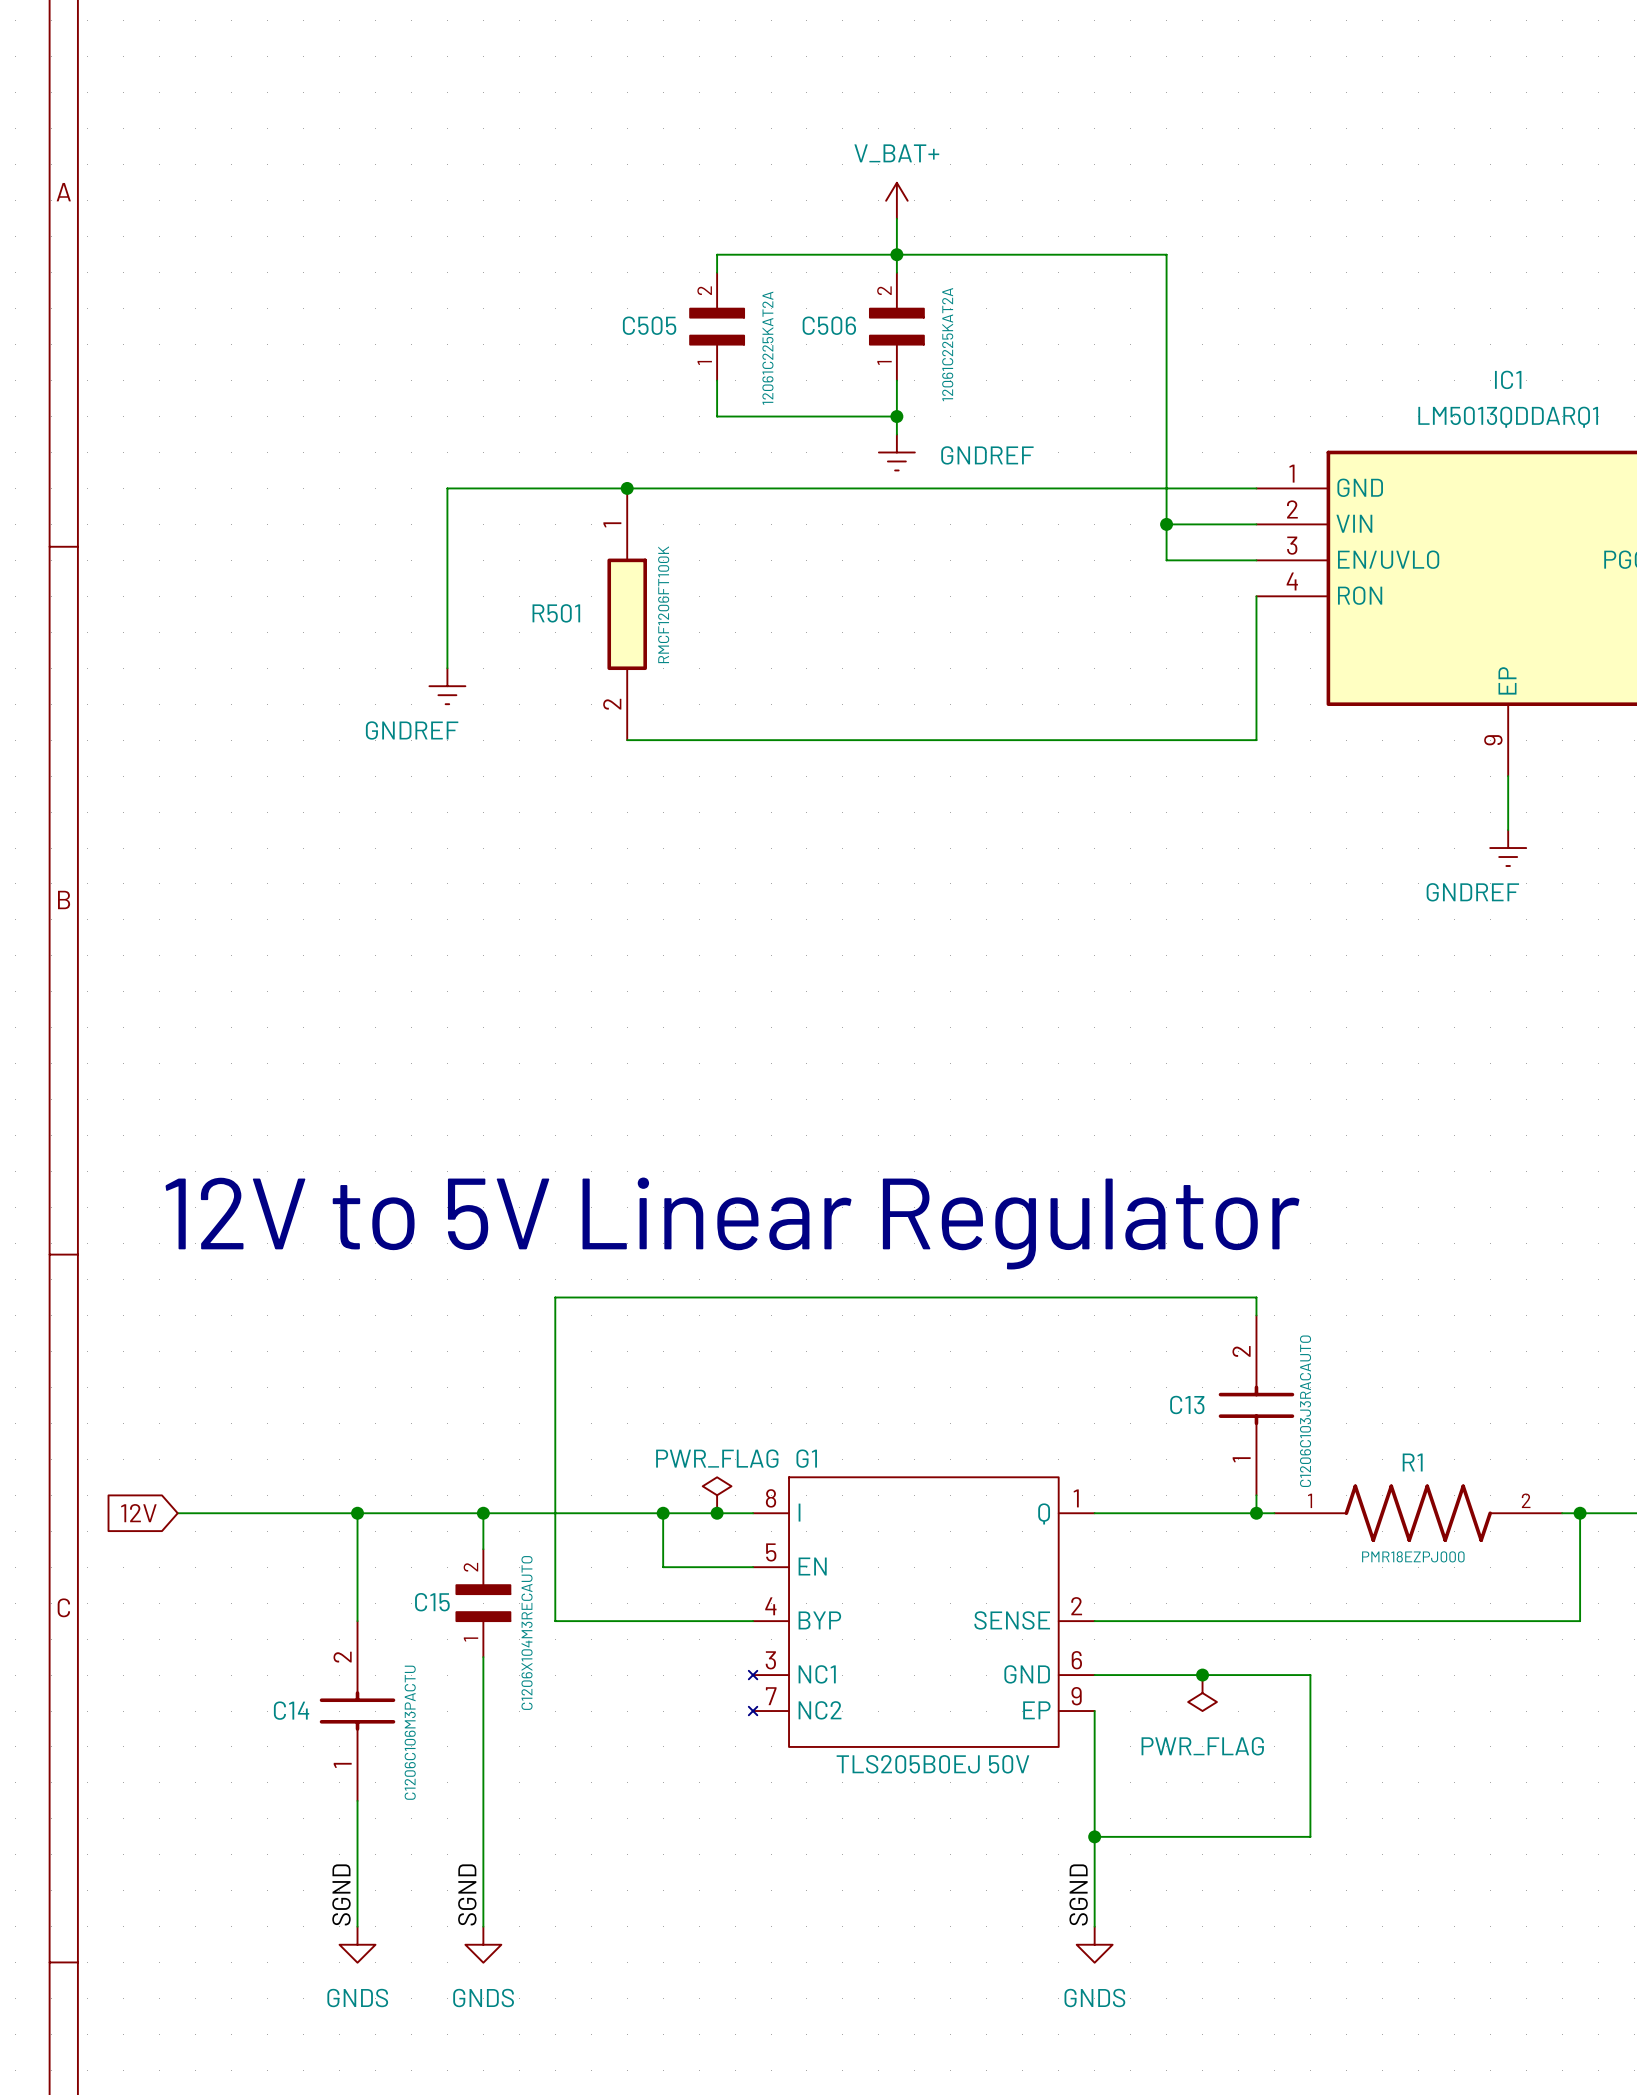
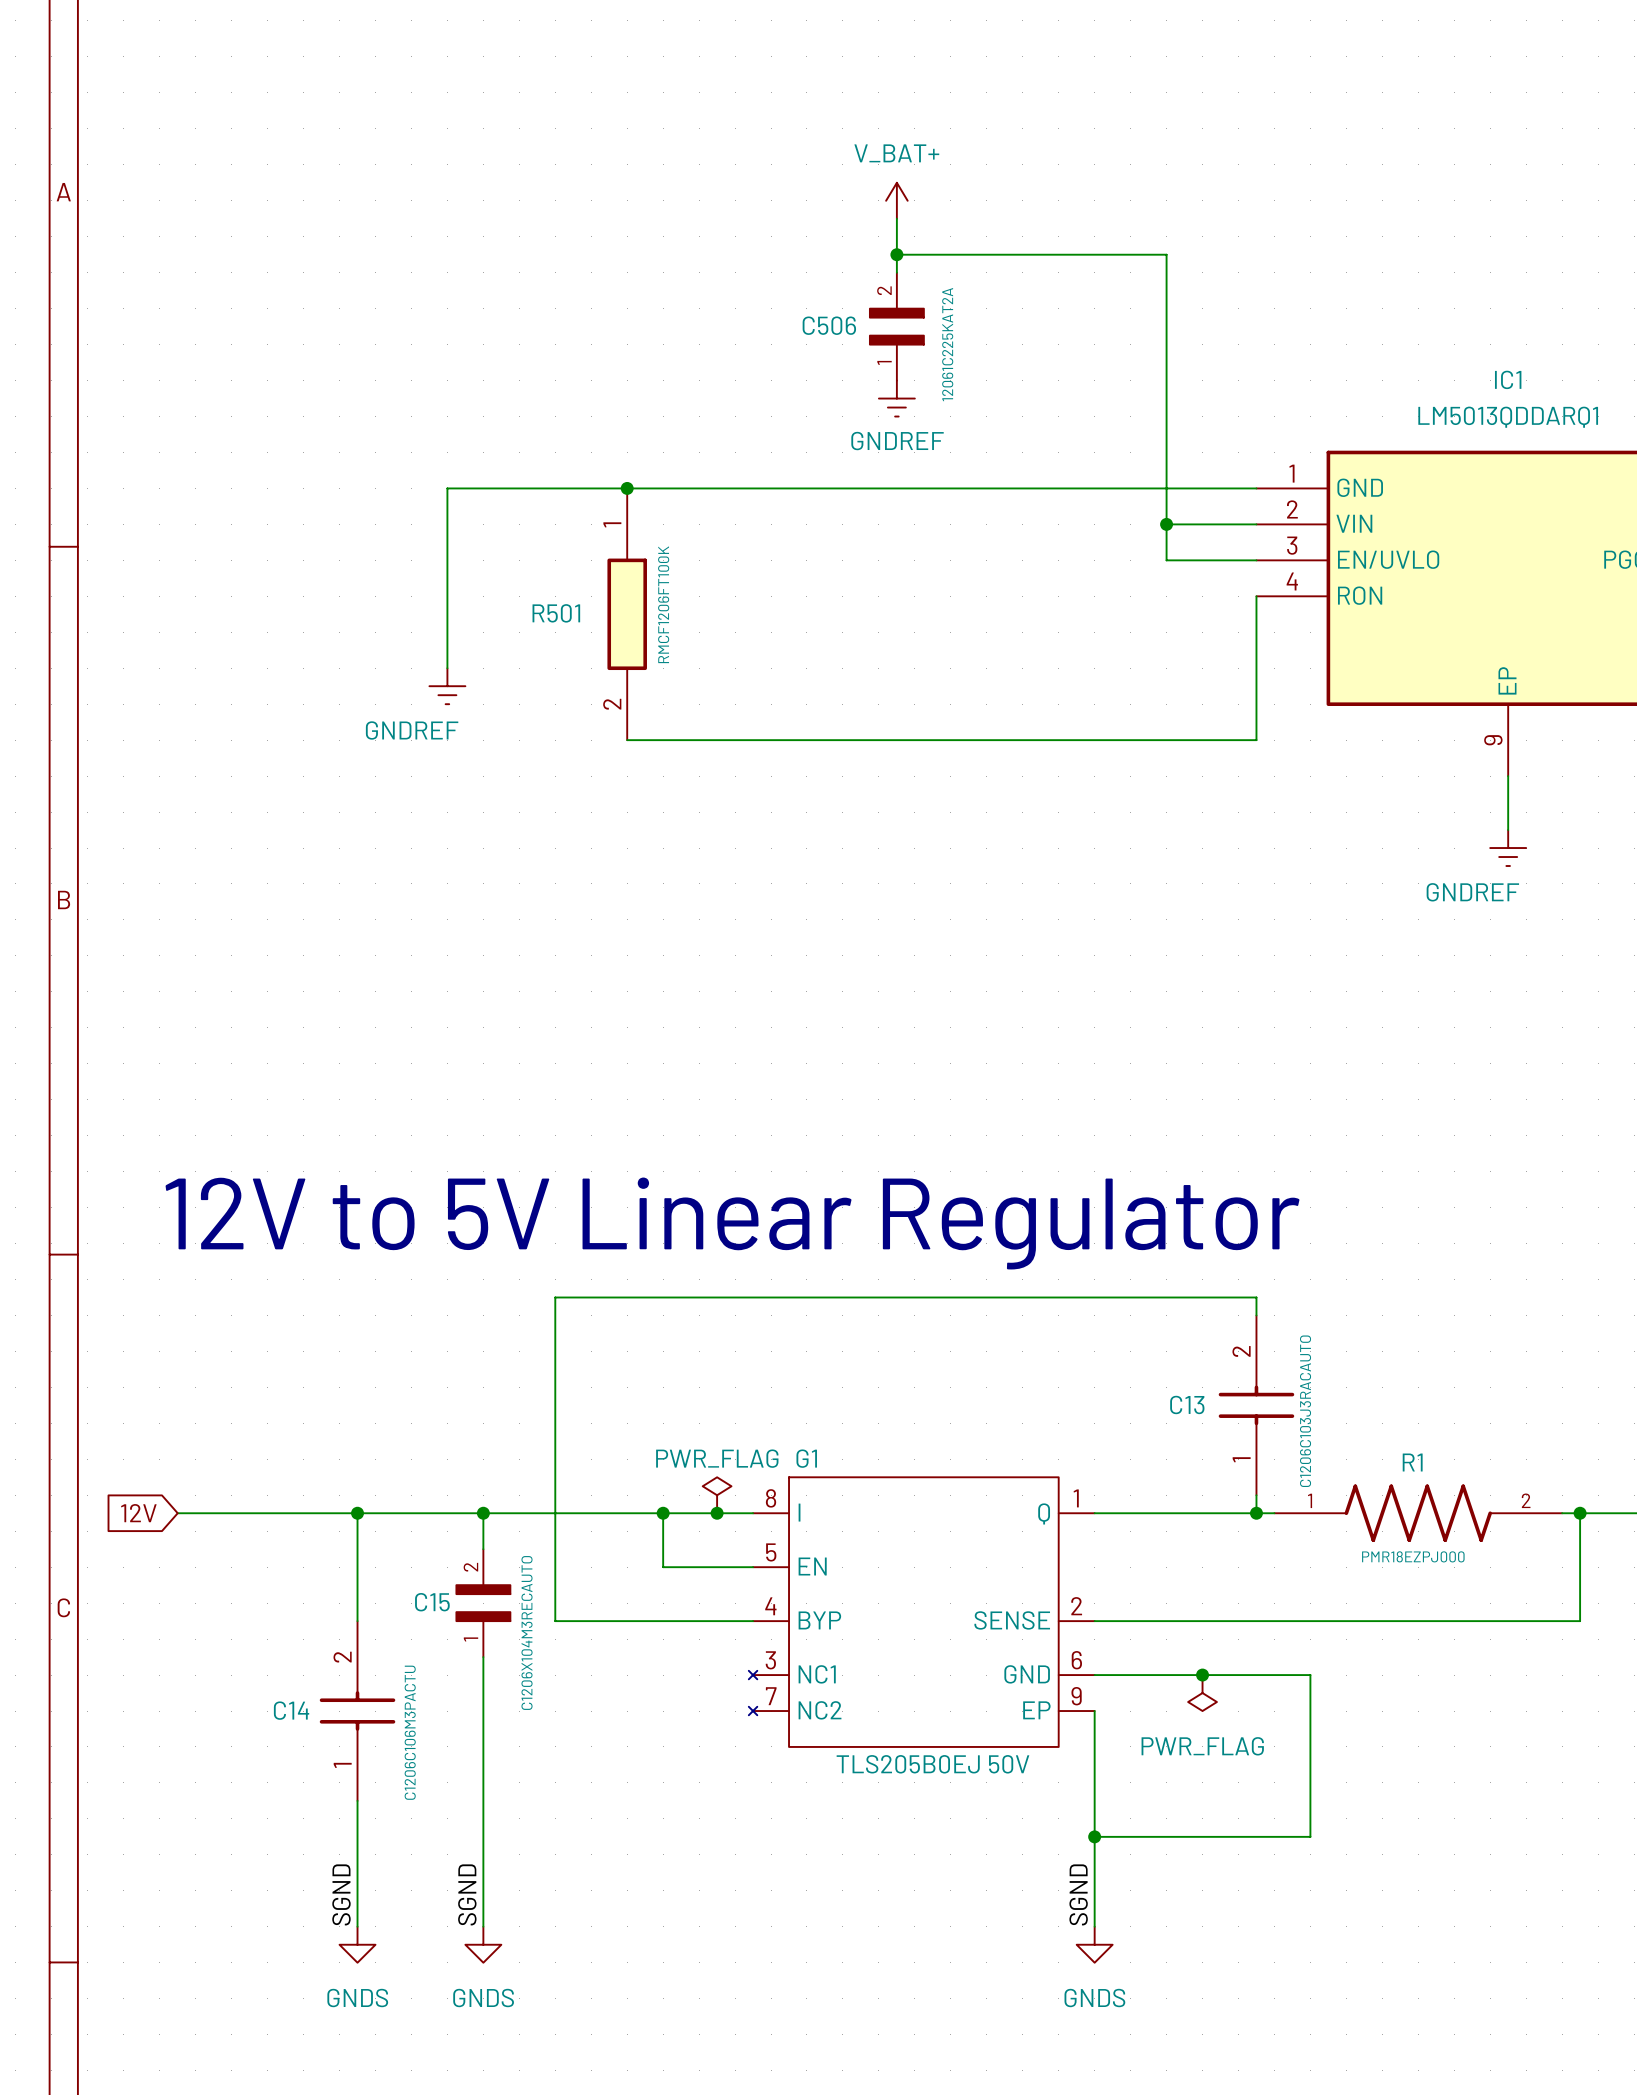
wire: (896, 254) (717, 254) (717, 272) -> none
C505: 12061C225KAT2A (717, 326) -> none
wire: (717, 380) (717, 416) (896, 416) -> none
wire: (896, 380) (896, 434) -> none
junction: (896, 416) -> none
power symbol position: GNDREF (896, 452) -> GNDREF (896, 398)
power symbol text position: GNDREF (987, 455) -> GNDREF (897, 441)

